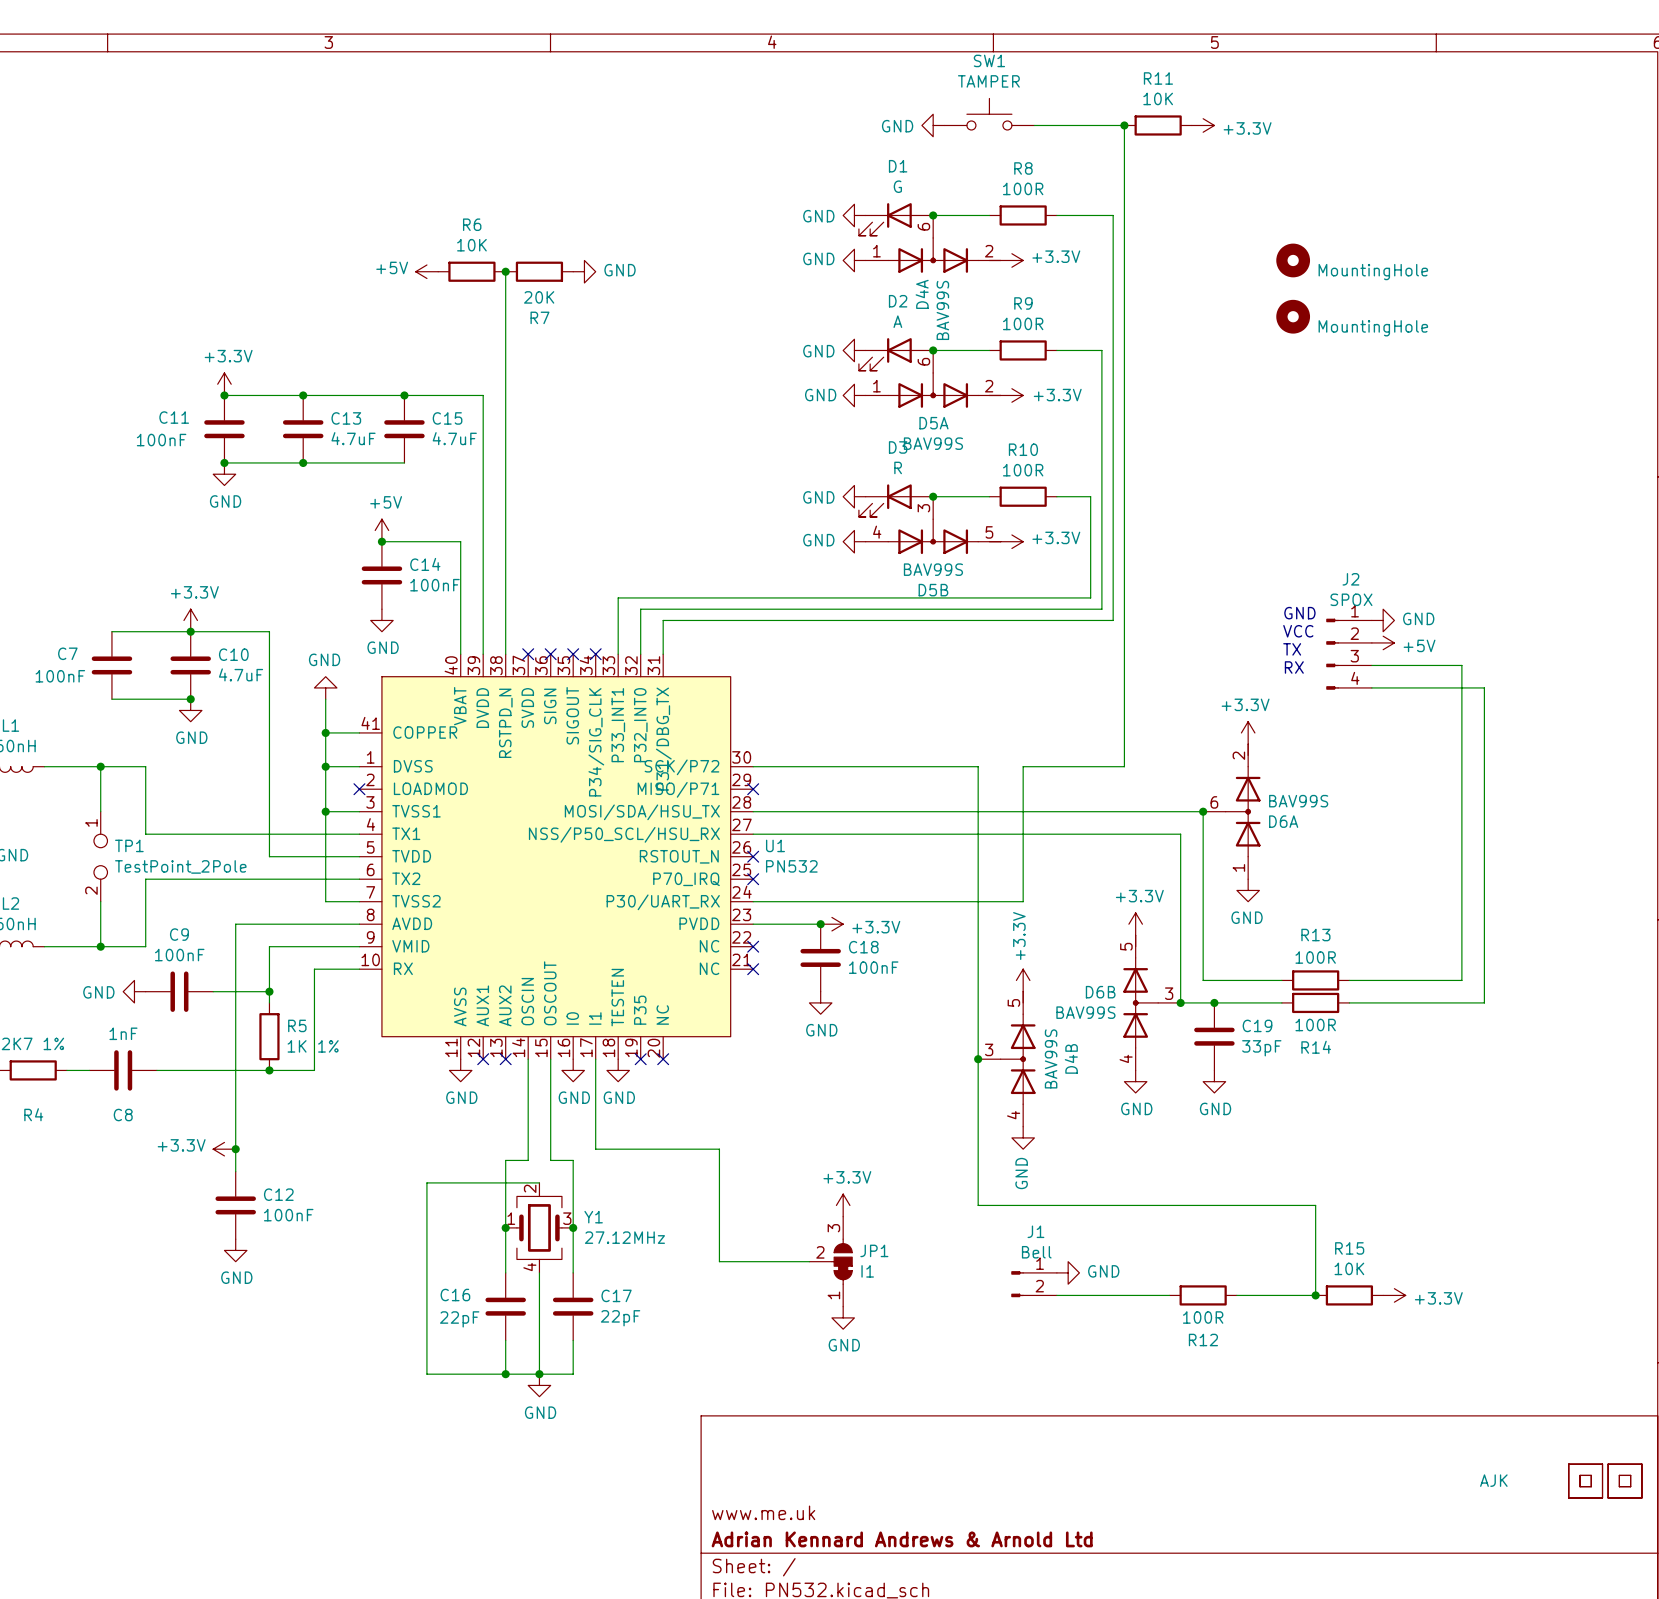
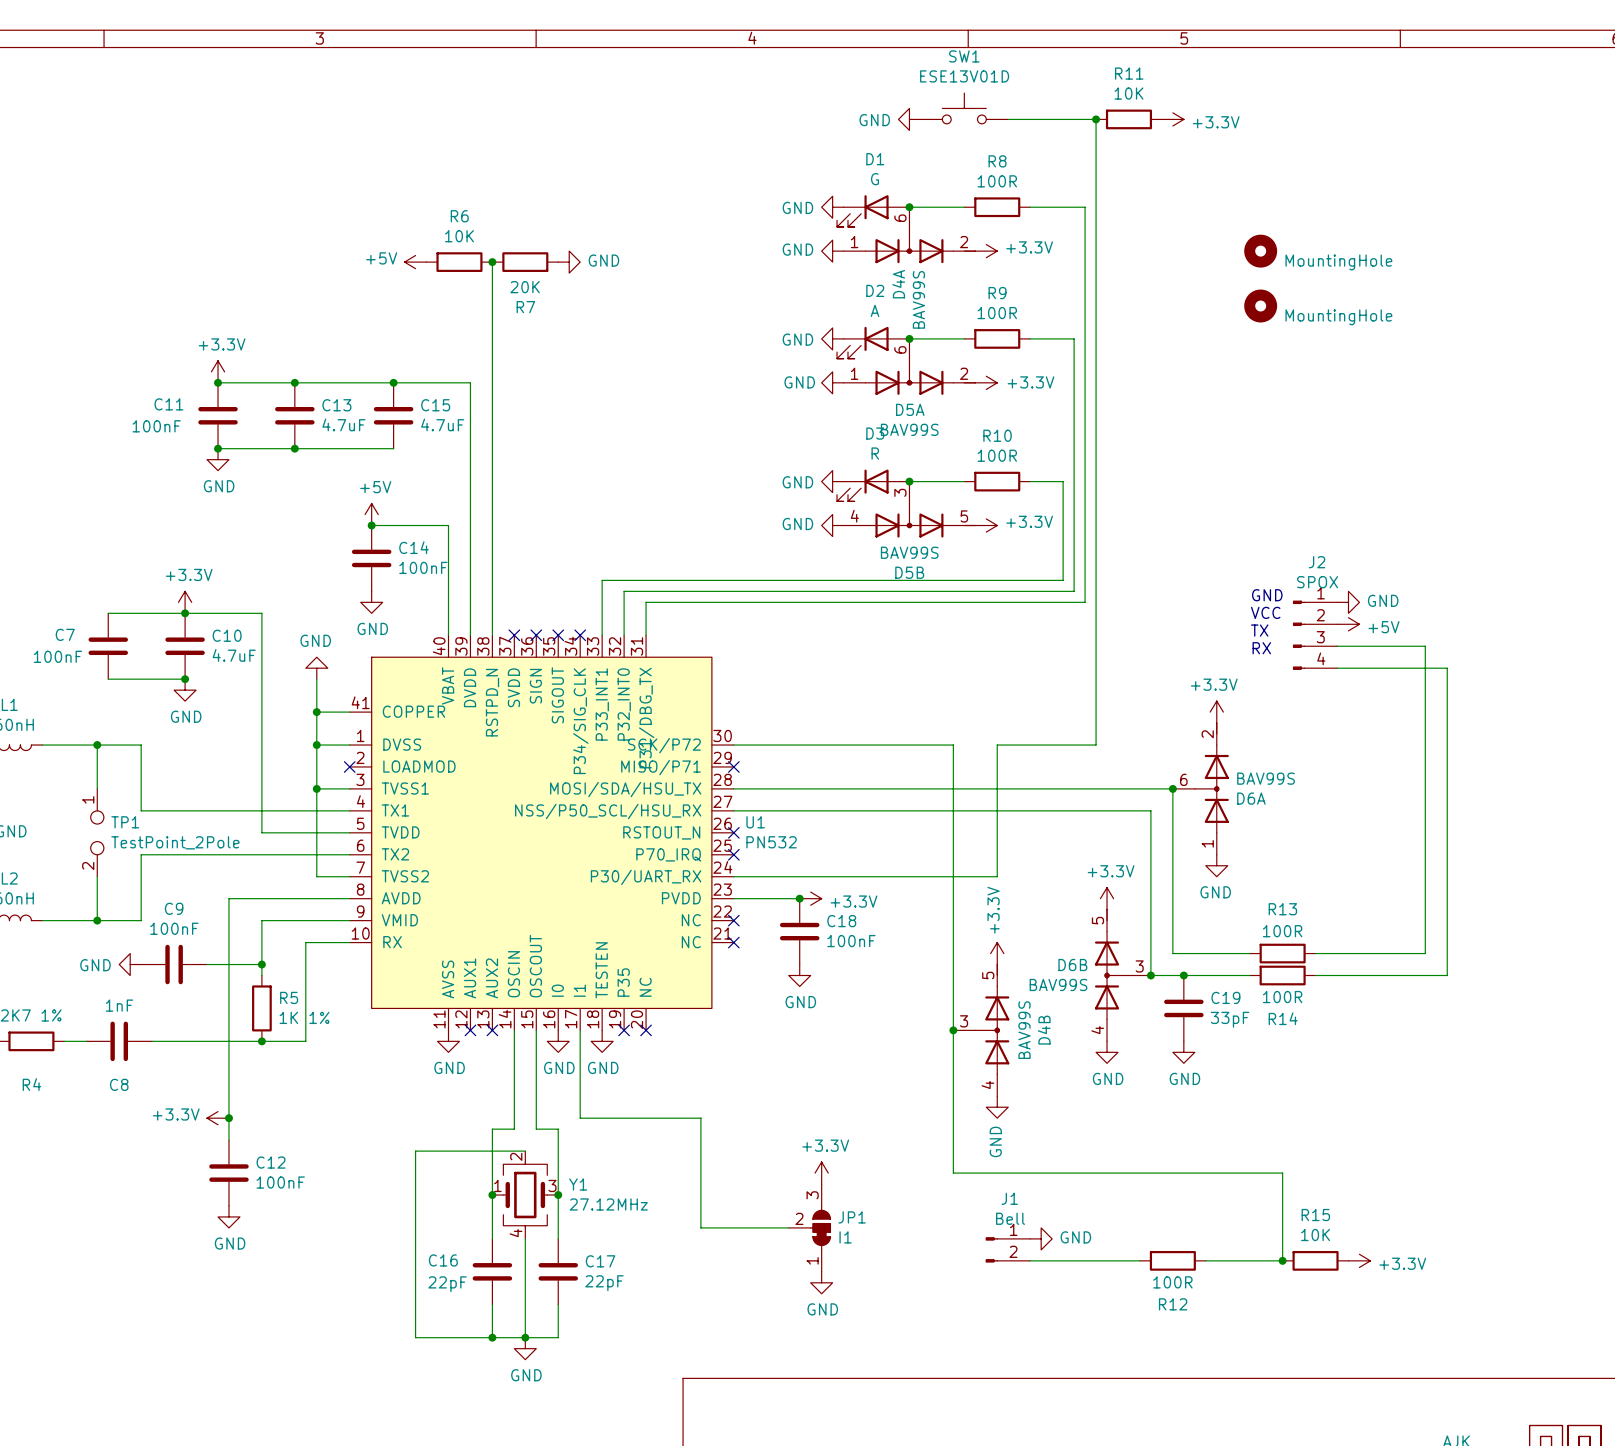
SW1 value: TAMPER (988, 81) -> ESE13V01D (964, 76)

